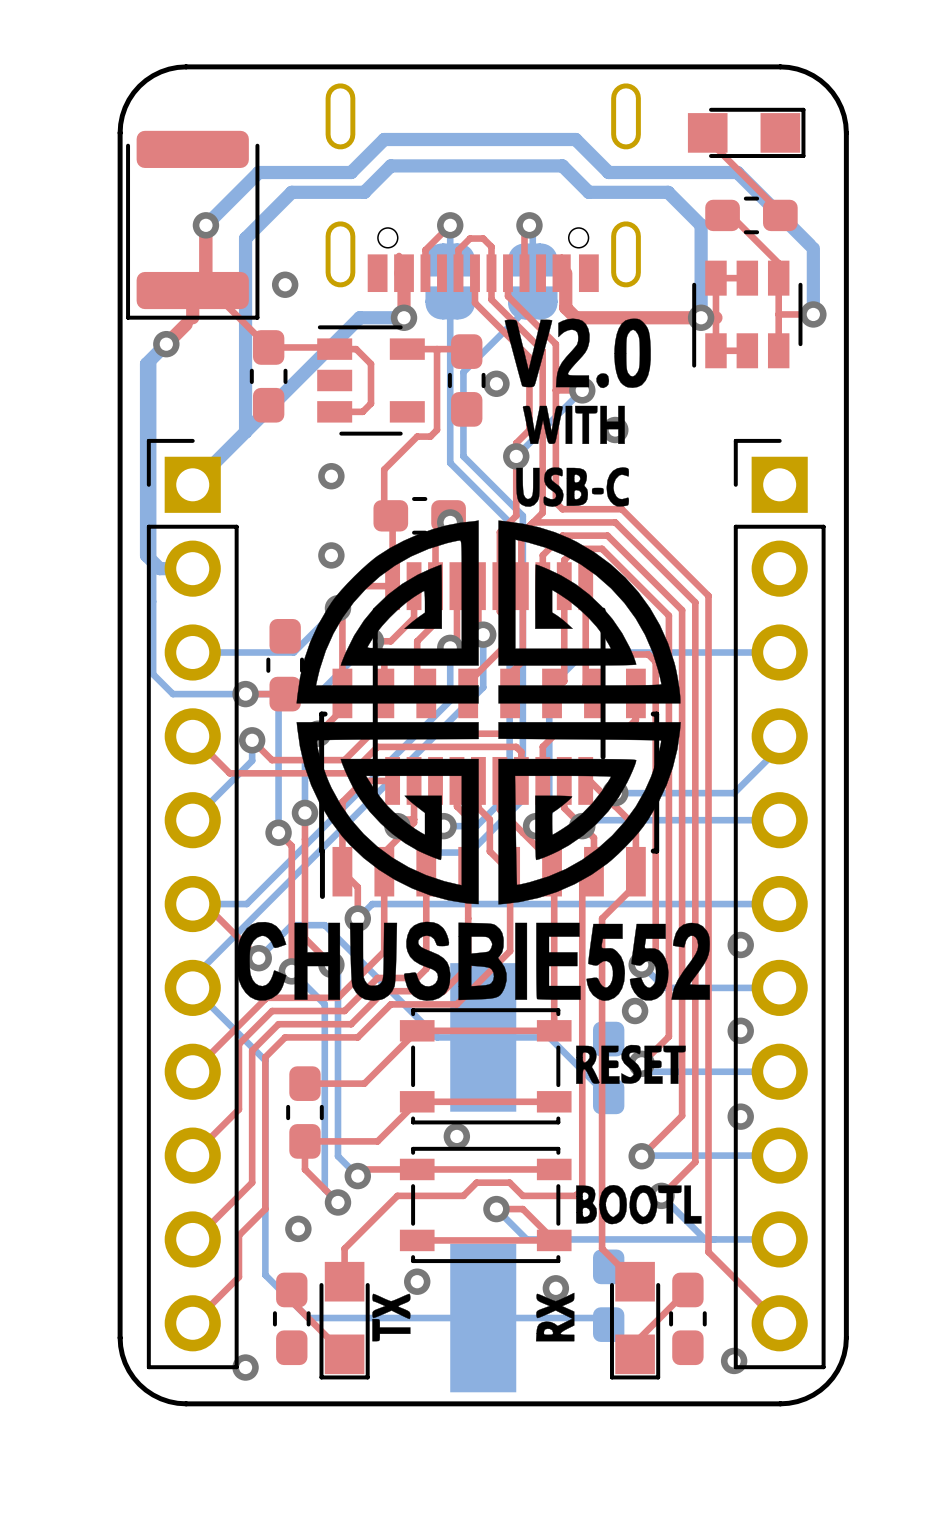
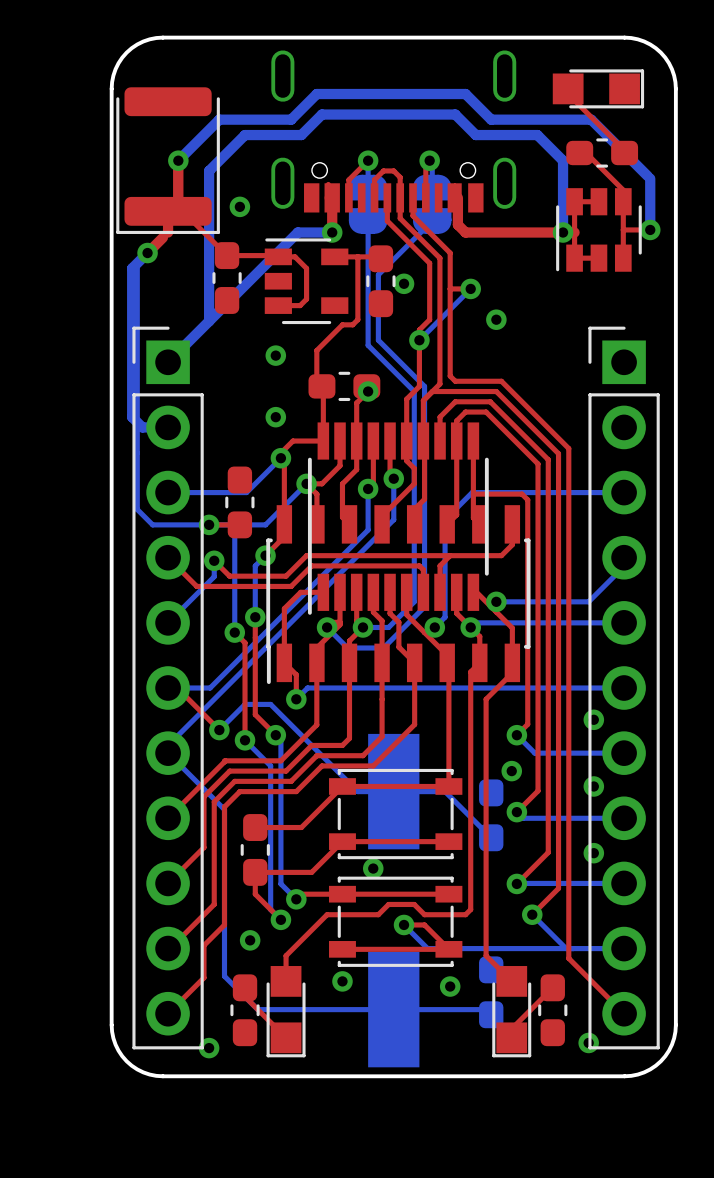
drawing: [236, 318, 710, 1342] -> none

